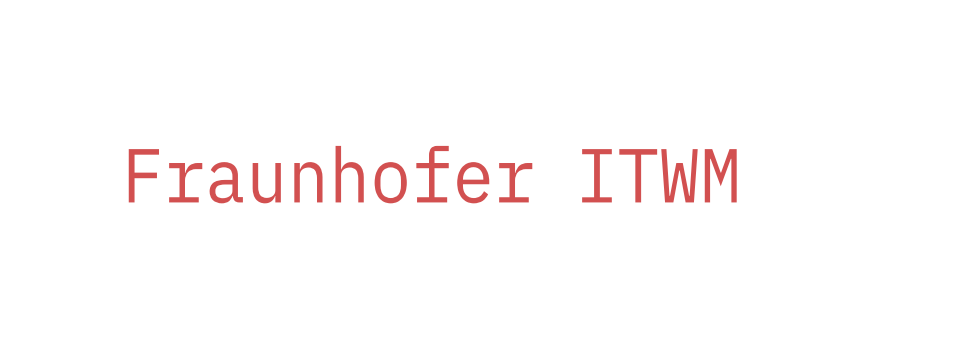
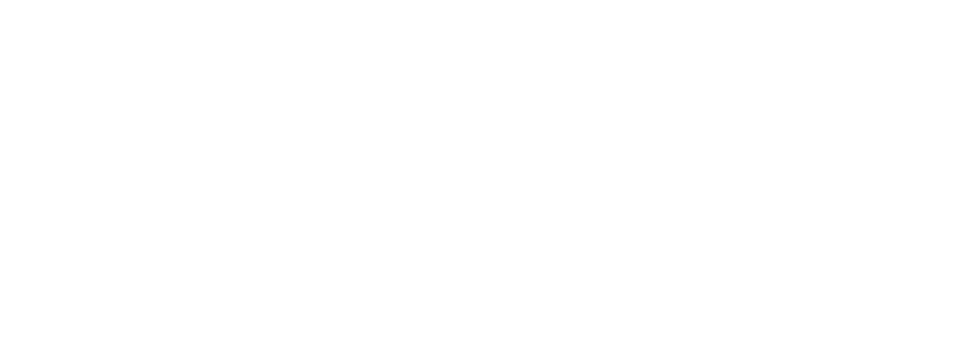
text: Fraunhofer ITWM (432, 174) -> none

